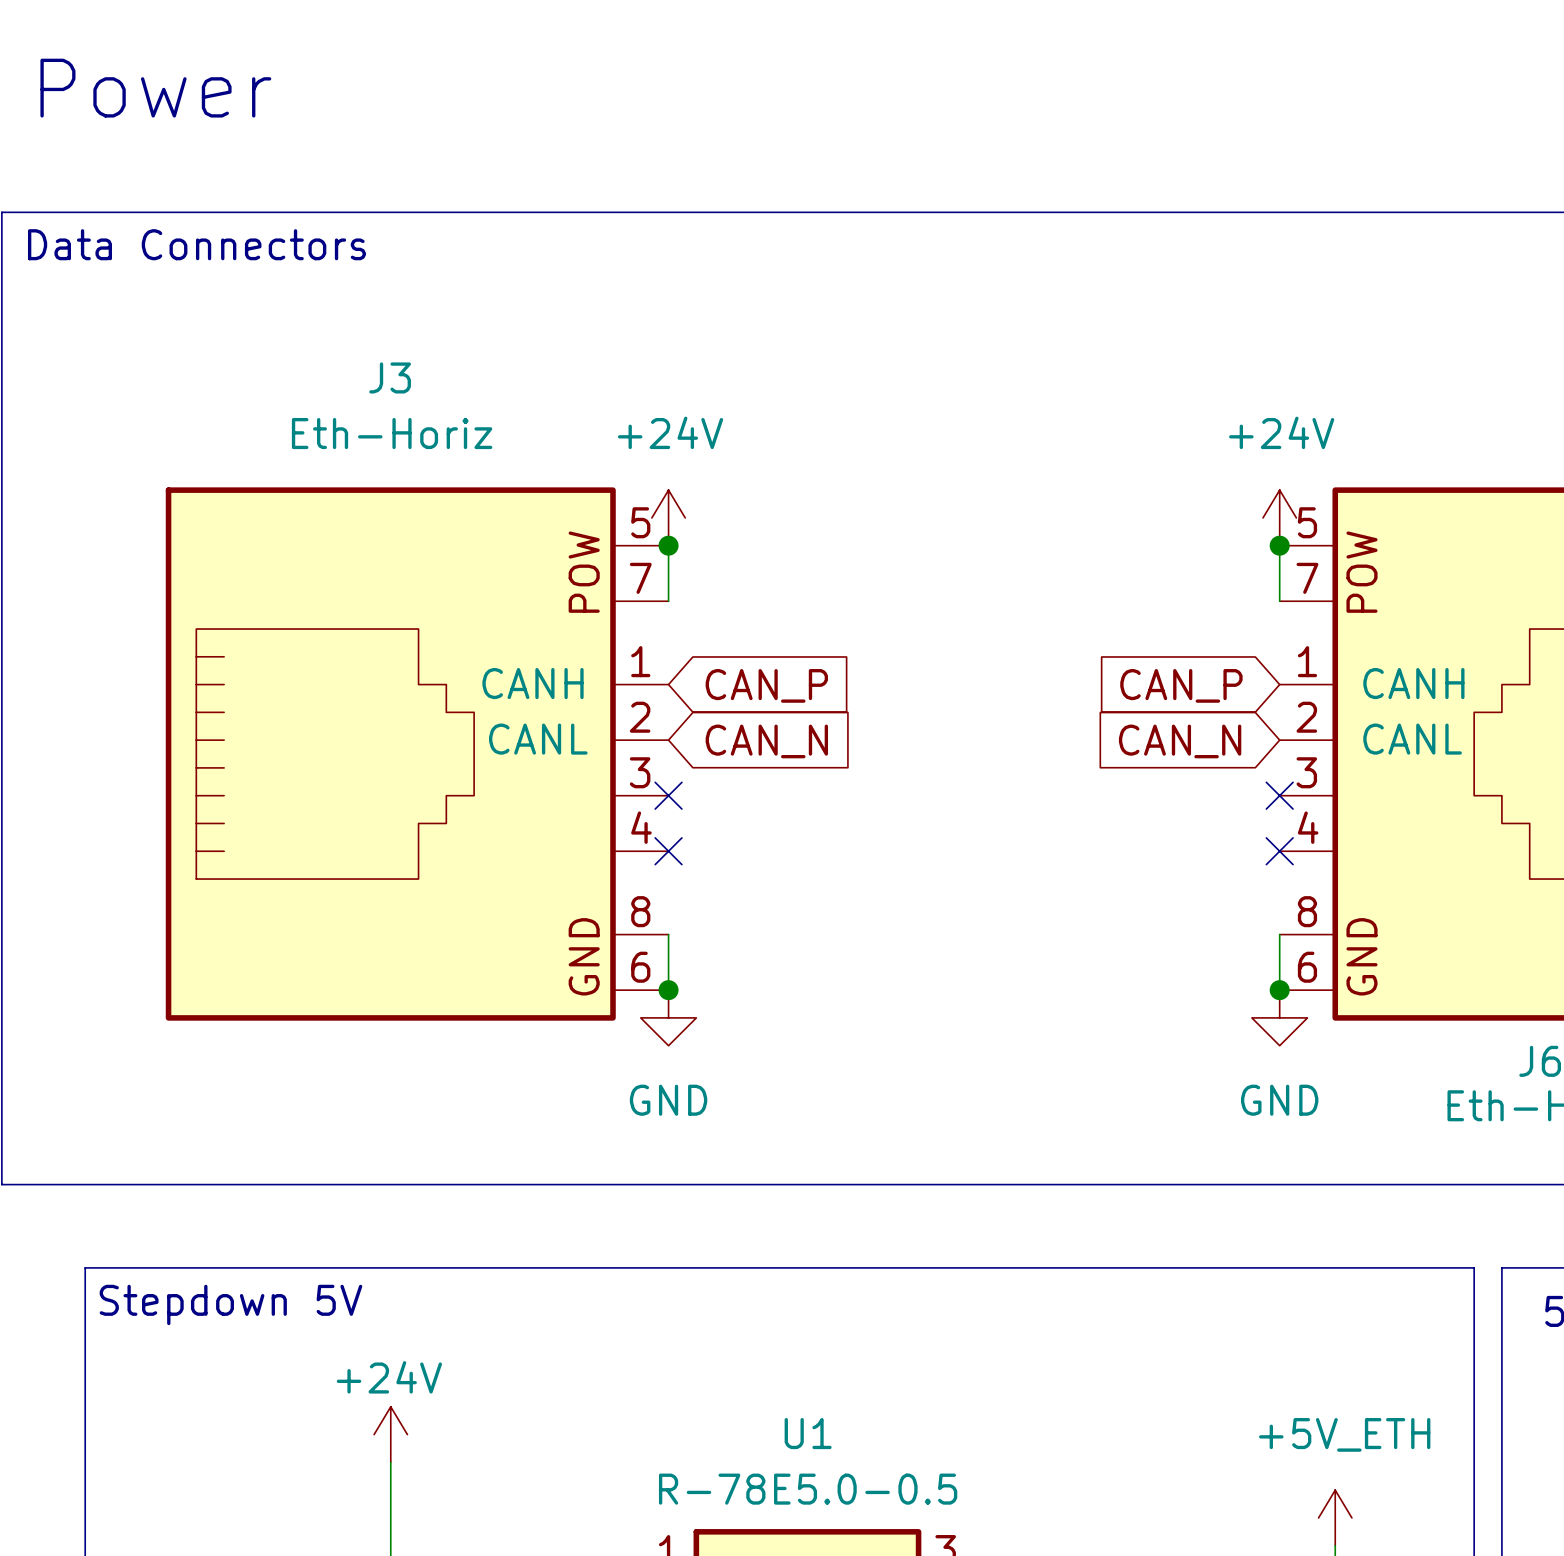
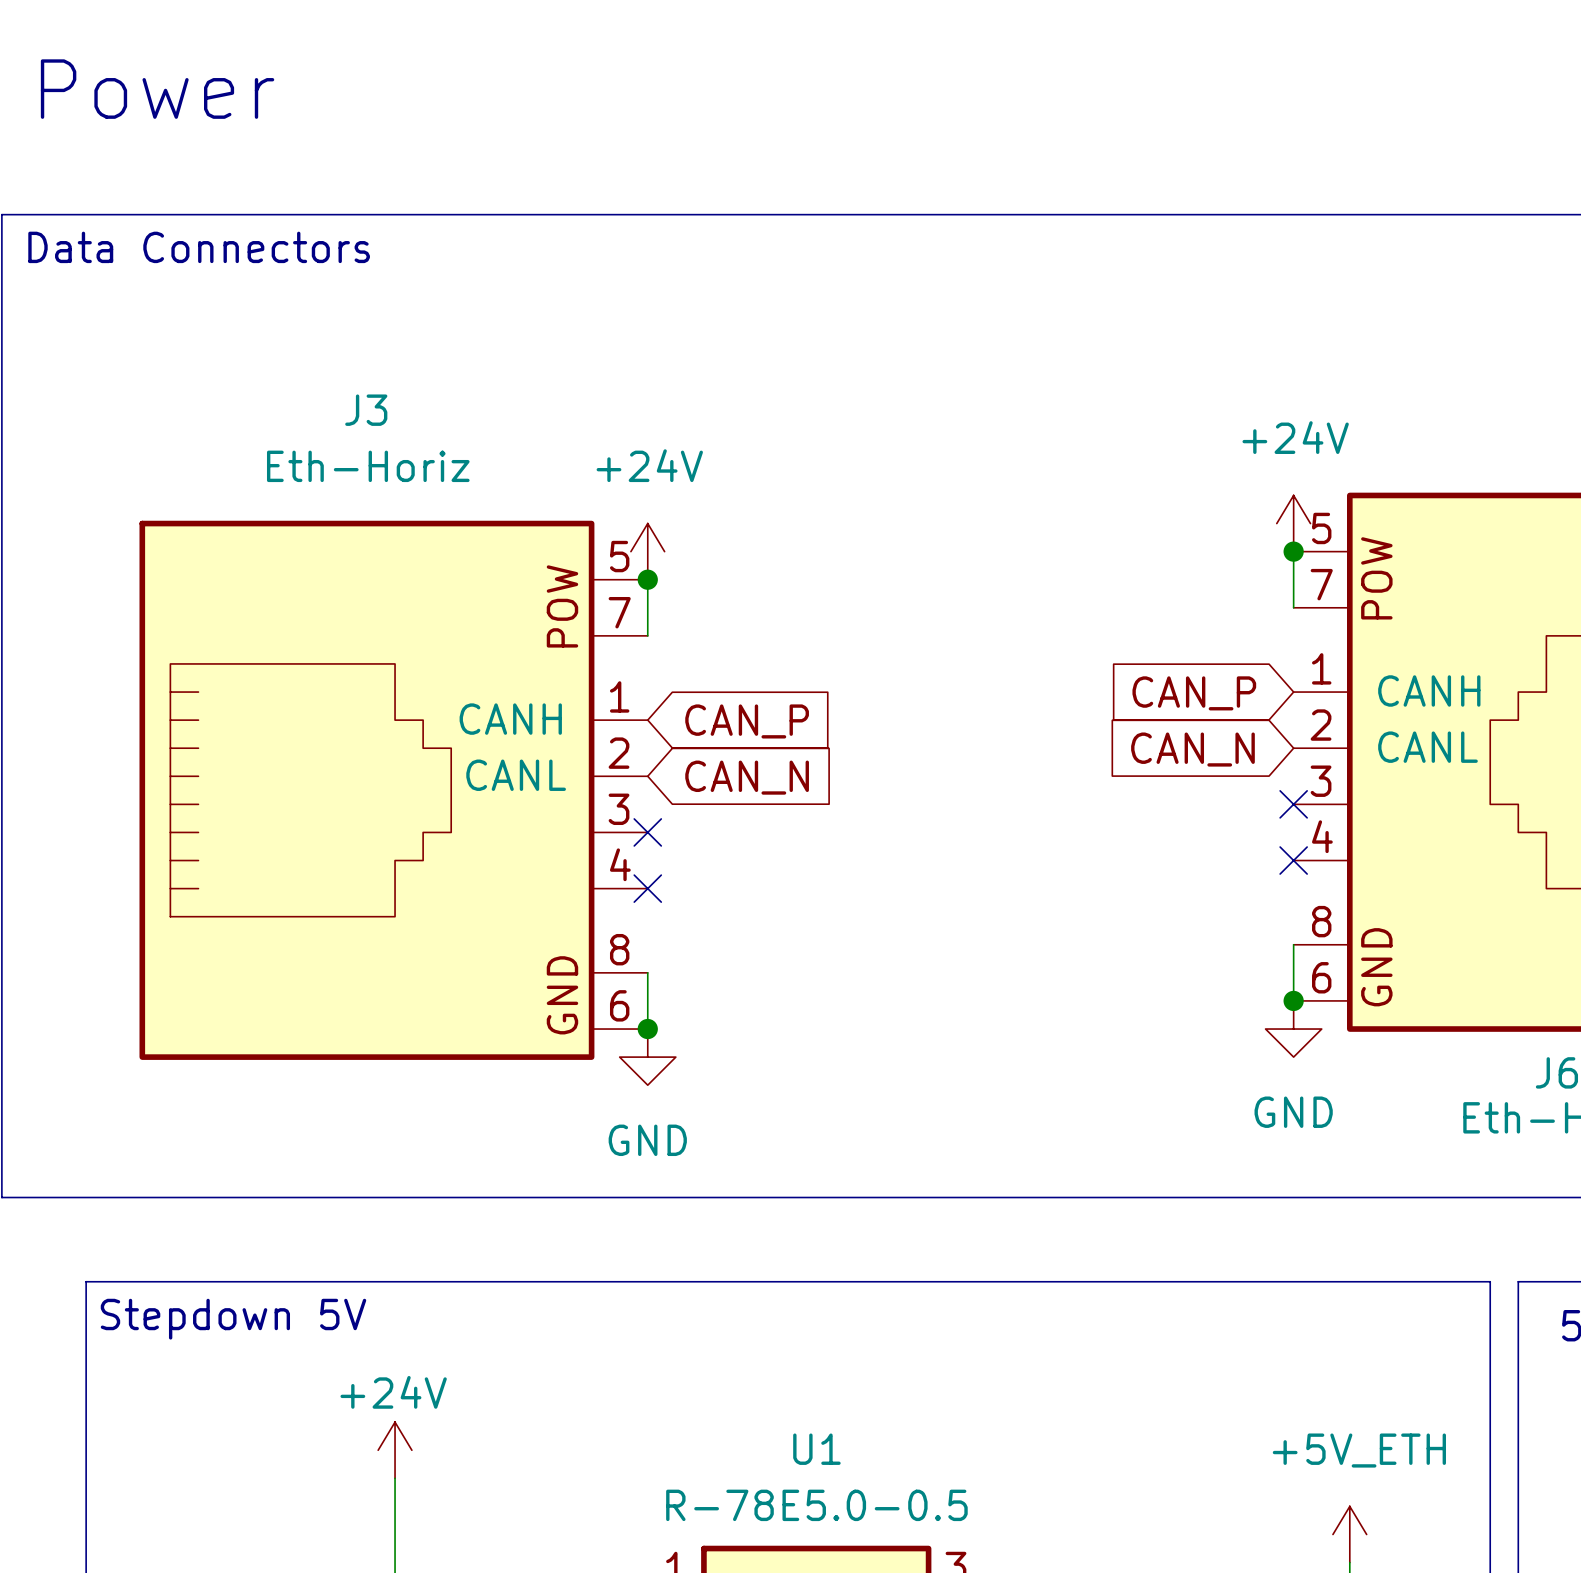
power symbol position: +24V (668, 517) -> +24V (647, 551)
wire: (668, 545) (668, 601) -> (647, 579) (647, 635)
junction position: (668, 545) -> (647, 579)
global label position: CAN_P (766, 685) -> CAN_P (747, 721)
global label position: CAN_N (766, 741) -> CAN_N (747, 777)
J3 position: (417, 754) -> (393, 790)
no-connect mark: (668, 795) -> none
no-connect mark: none -> (647, 832)
no-connect mark: (668, 851) -> none
no-connect mark: none -> (647, 888)
wire: (668, 934) (668, 990) -> (647, 972) (647, 1029)
junction position: (668, 990) -> (647, 1029)
power symbol position: GND (668, 1017) -> GND (647, 1057)

